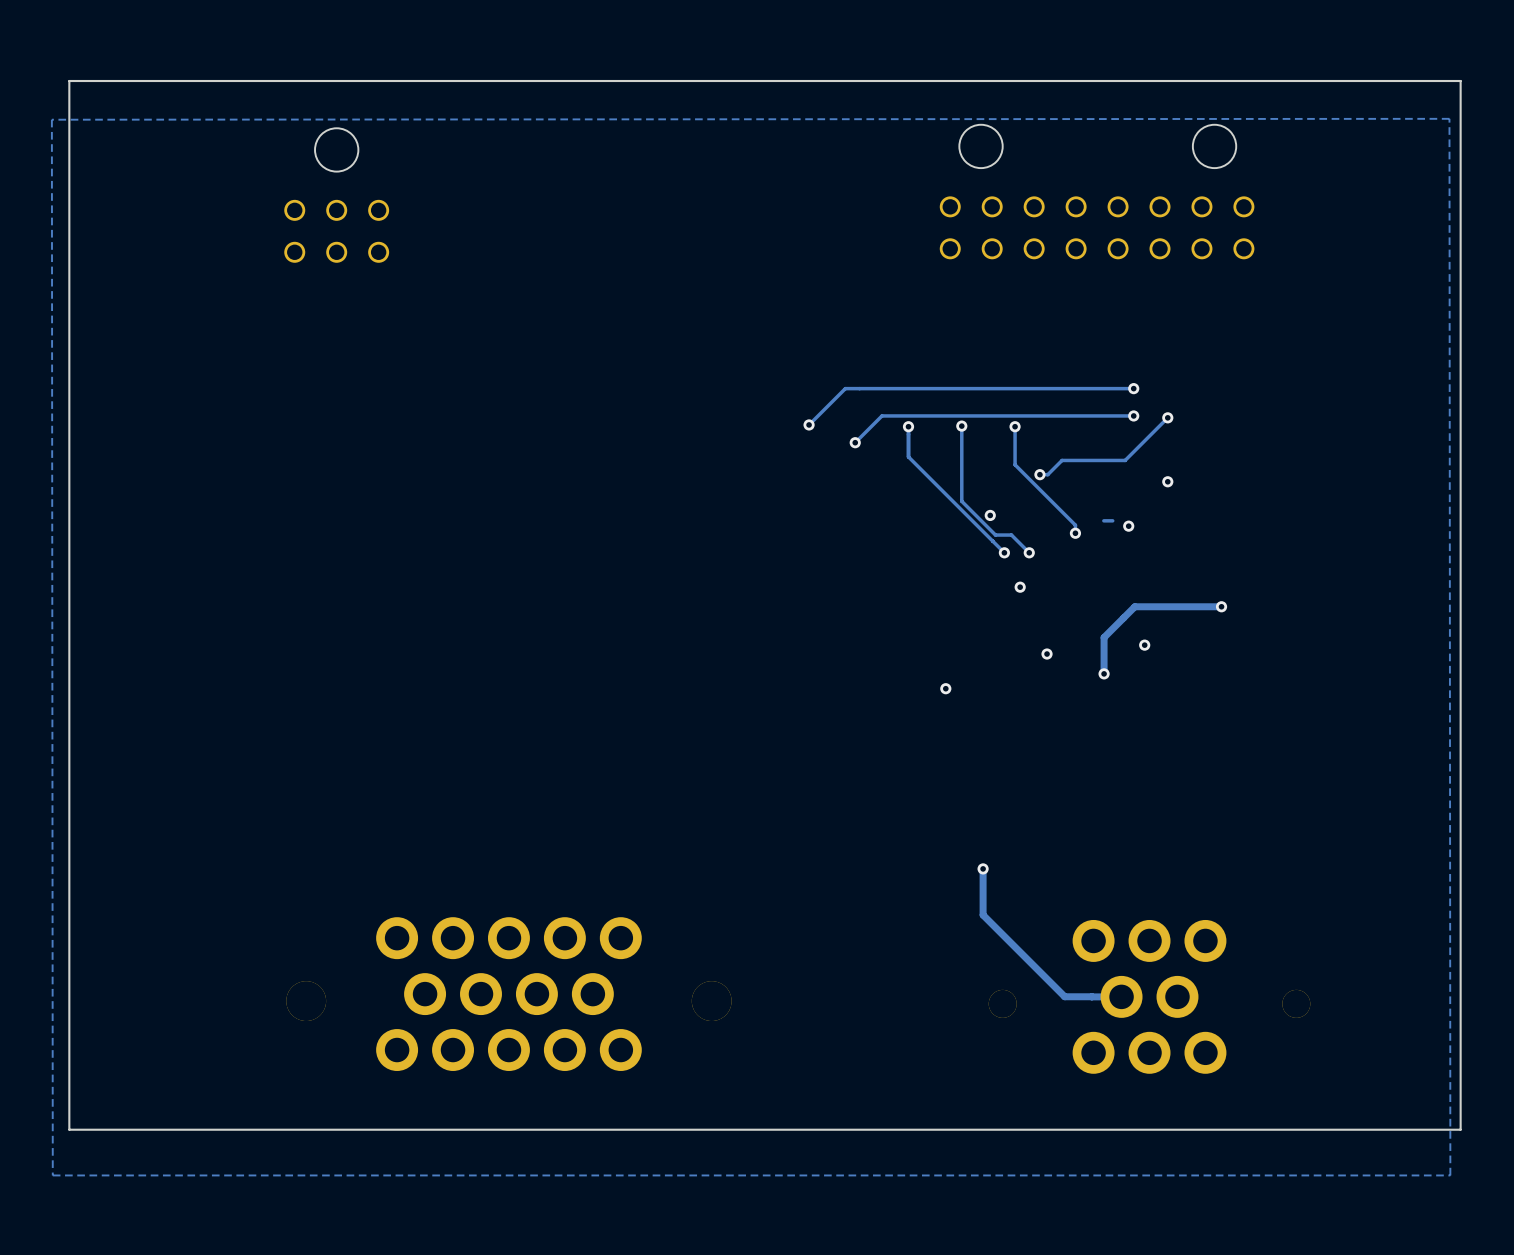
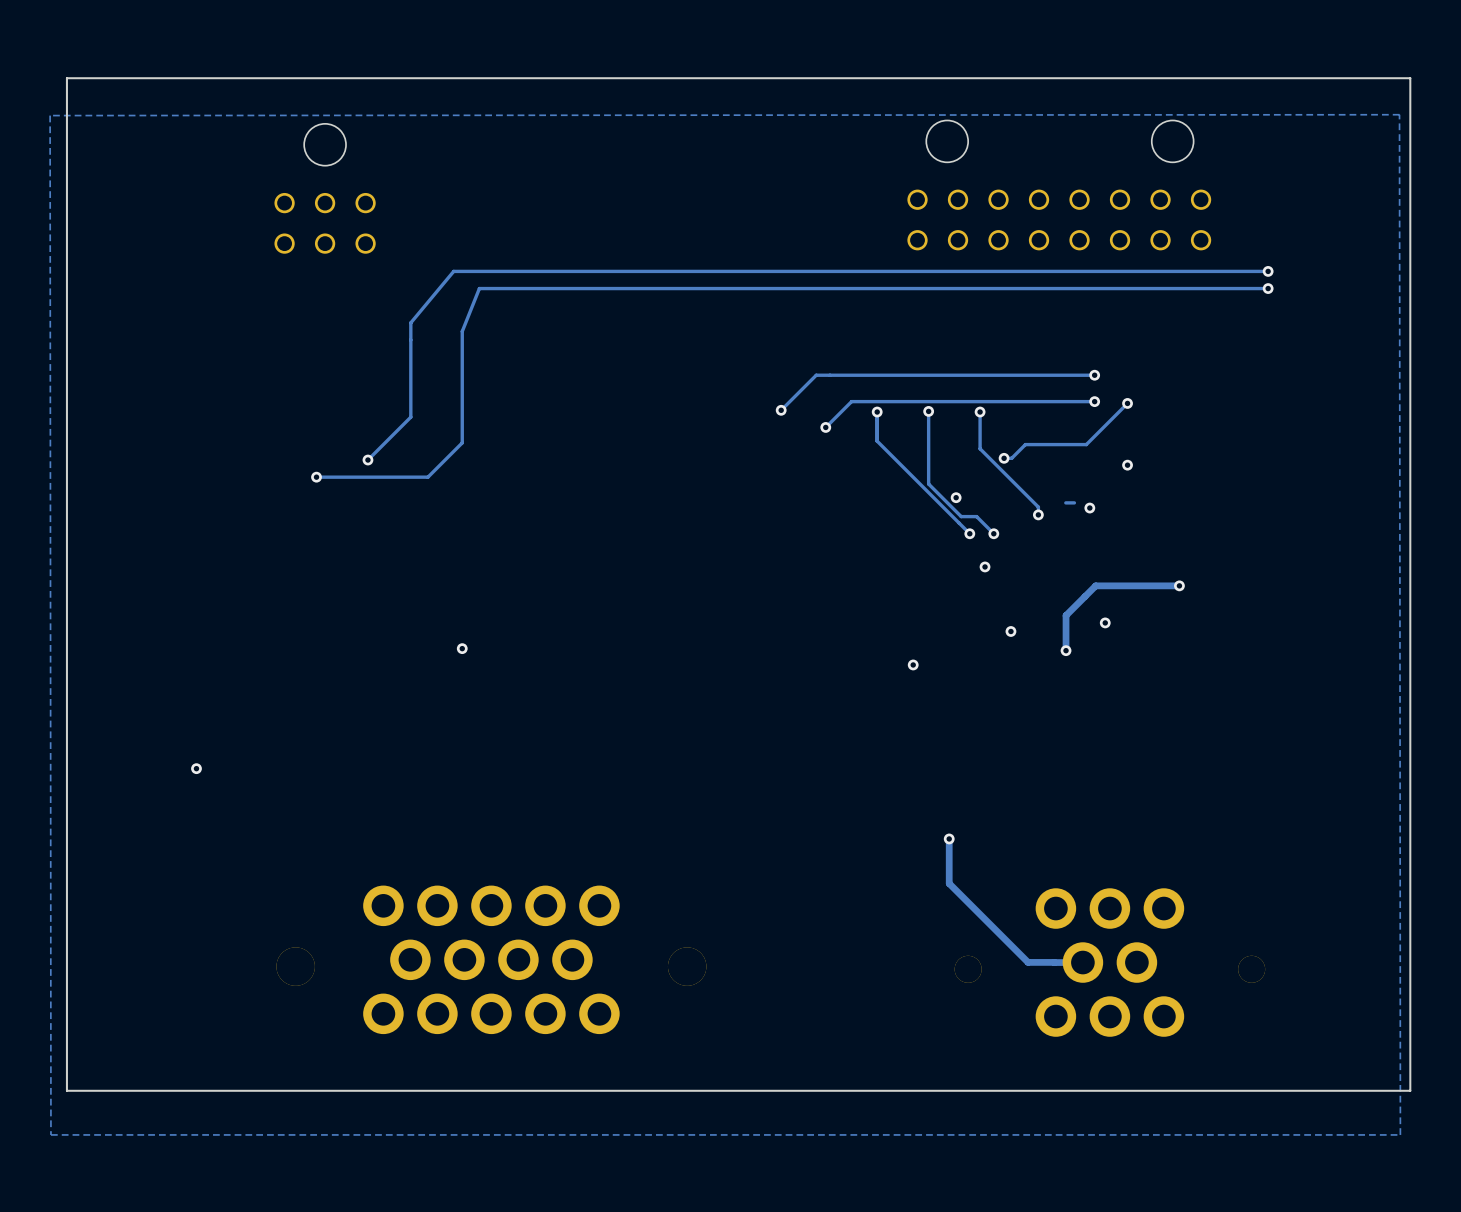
track: none -> (1268, 271) (453, 271) (410, 322) (410, 417) (367, 460)
via: none -> (1268, 271)
track: none -> (1268, 288) (479, 288) (462, 331) (462, 442) (427, 477) (316, 477)
via: none -> (1268, 288)
via: none -> (367, 460)
via: none -> (316, 477)
via: none -> (462, 648)
via: none -> (196, 768)

